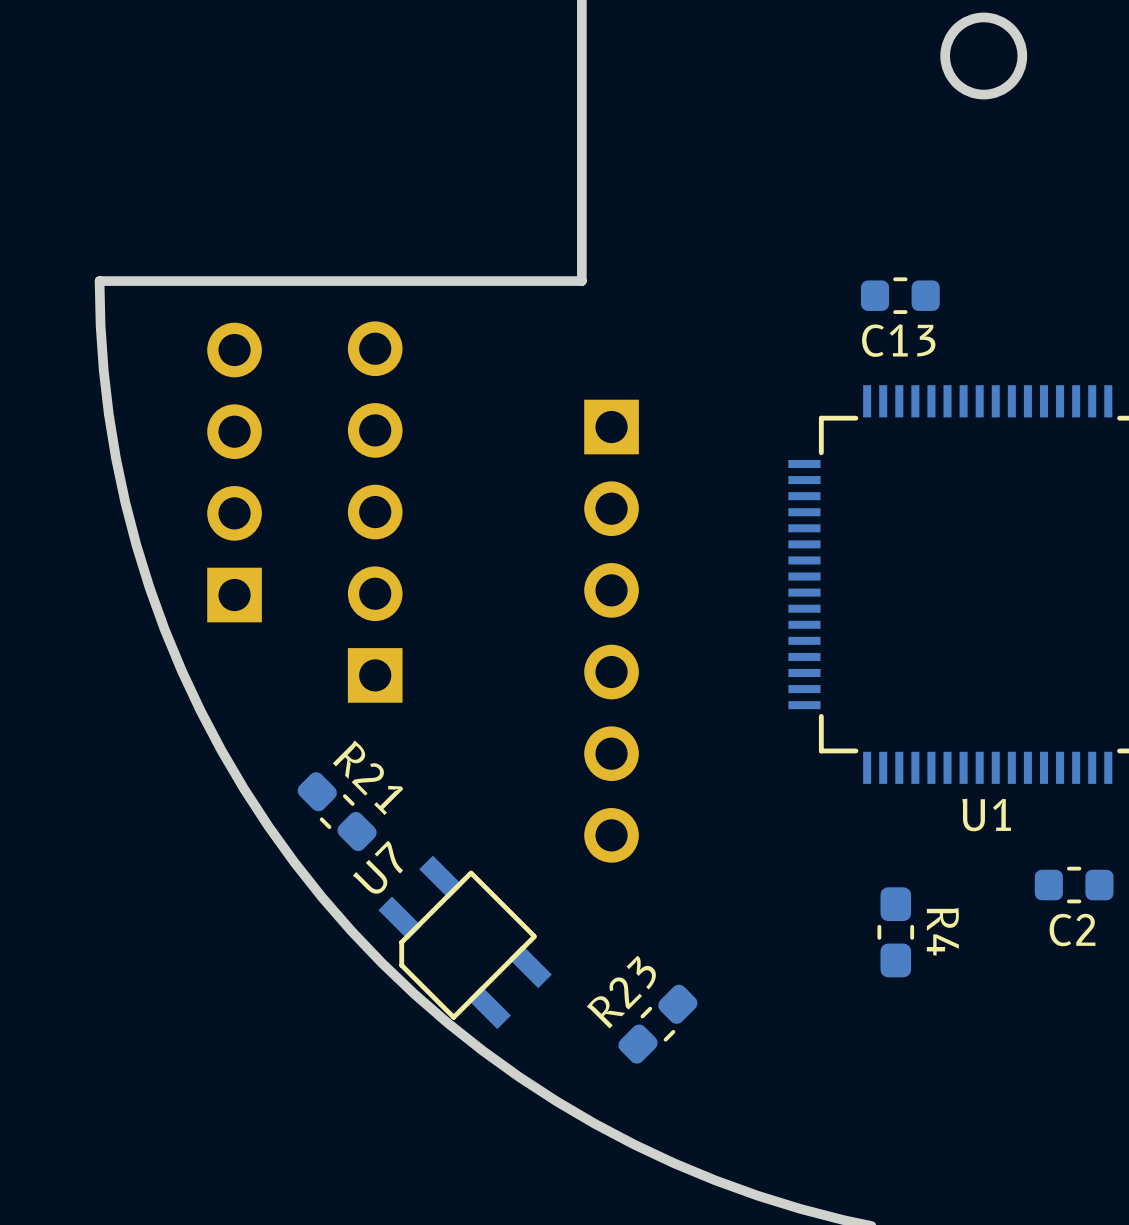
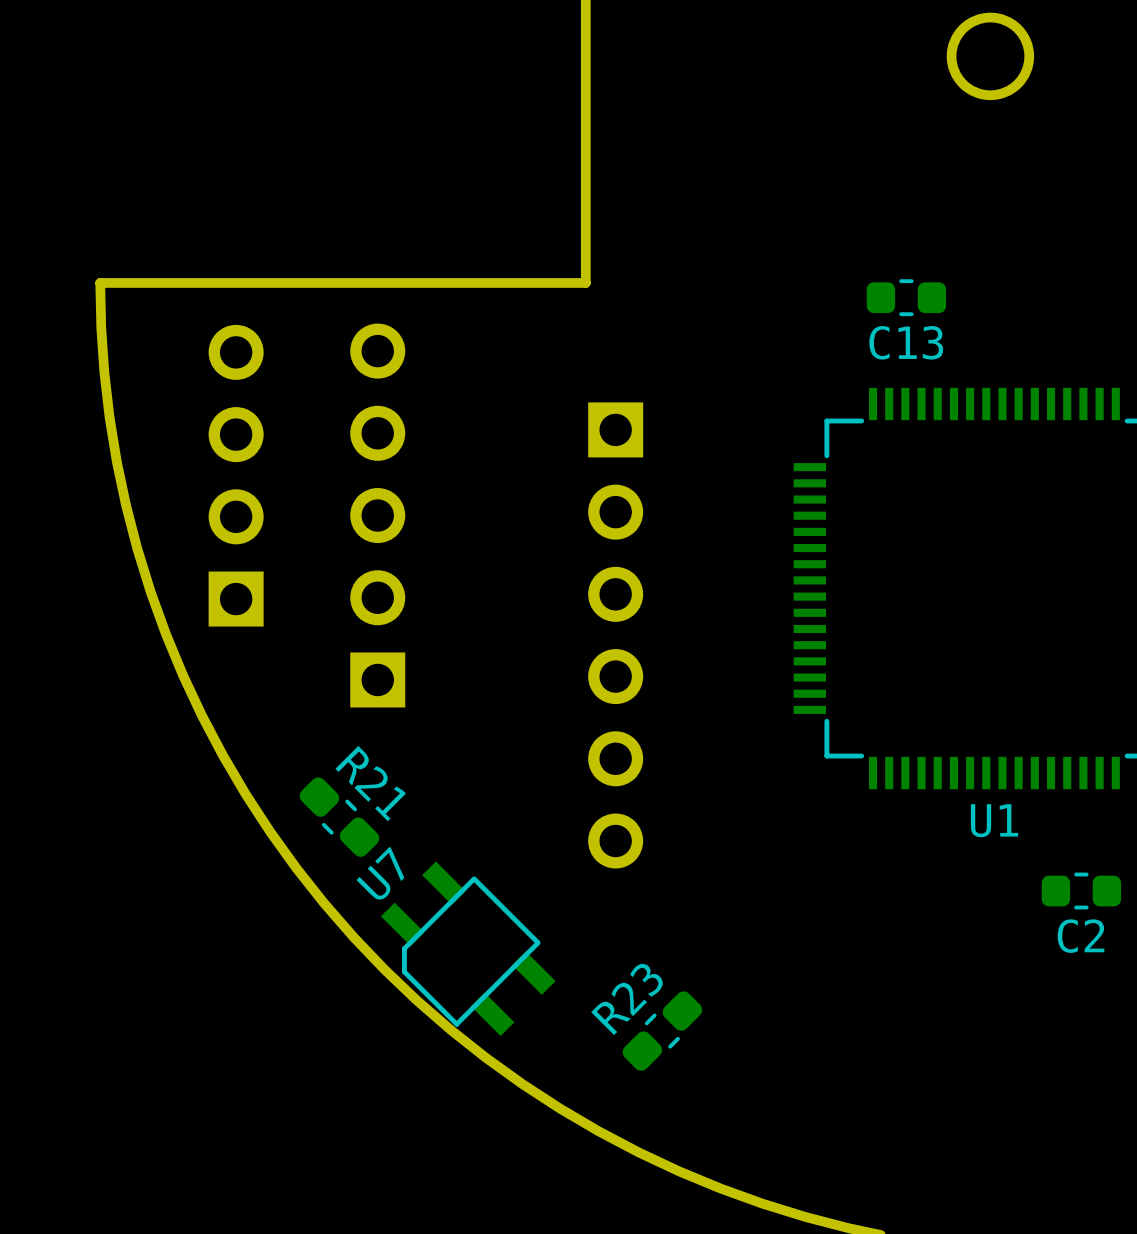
R4: (895, 932) -> none

